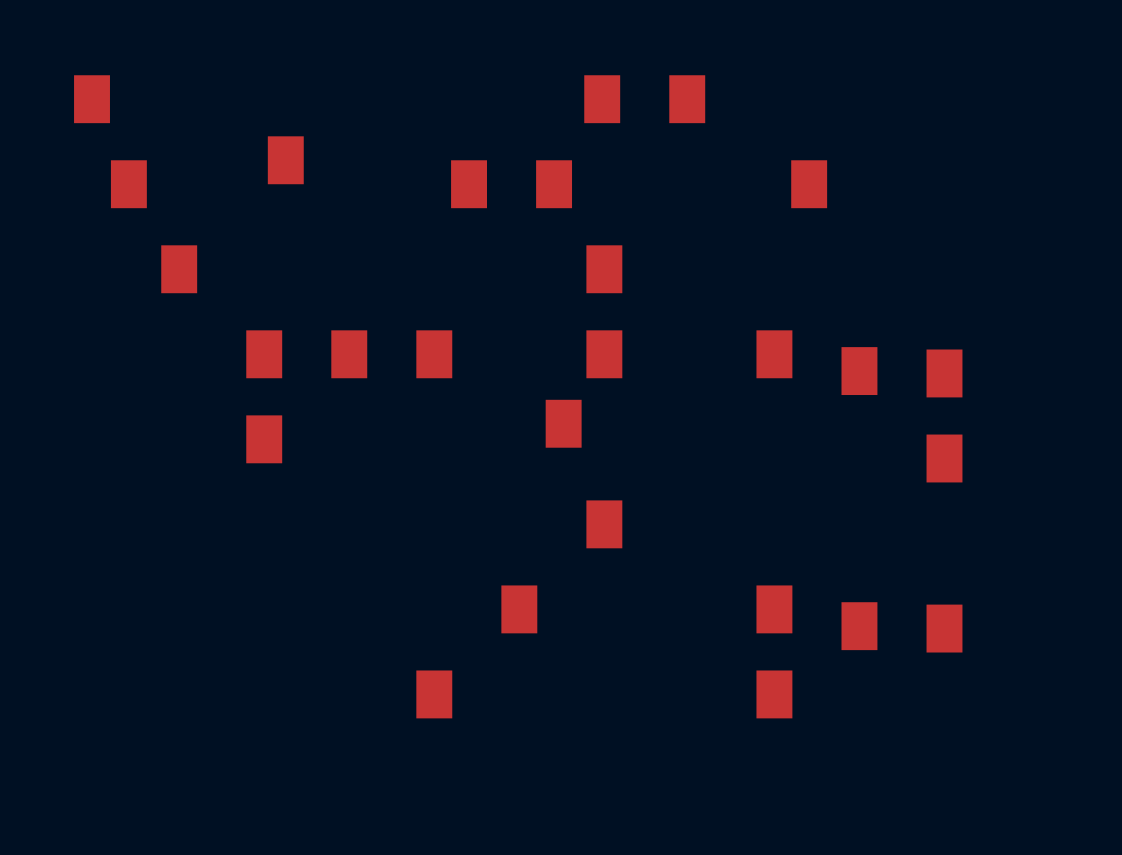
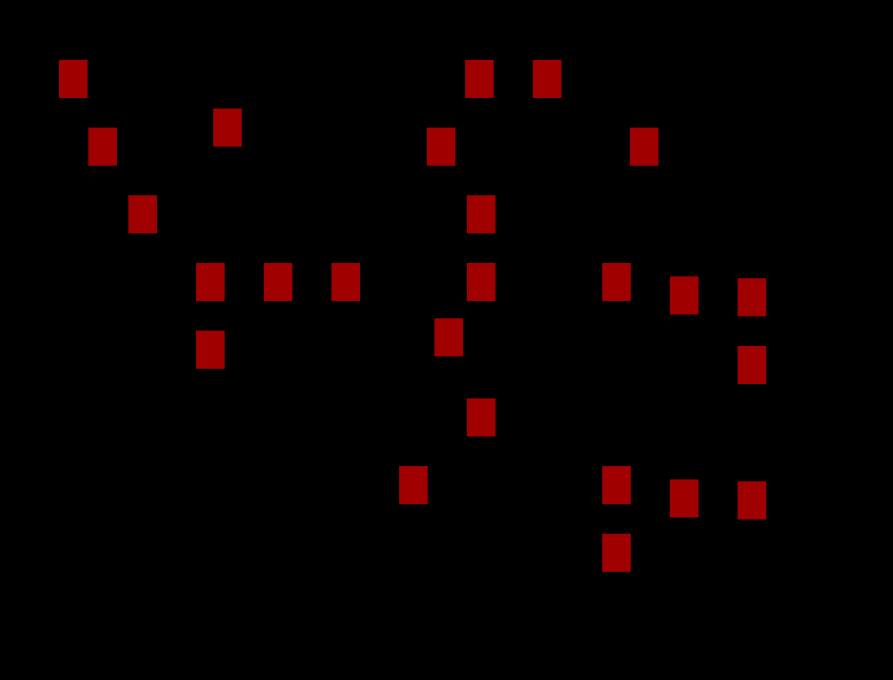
part: (469, 184) -> none
part: (434, 694) -> none

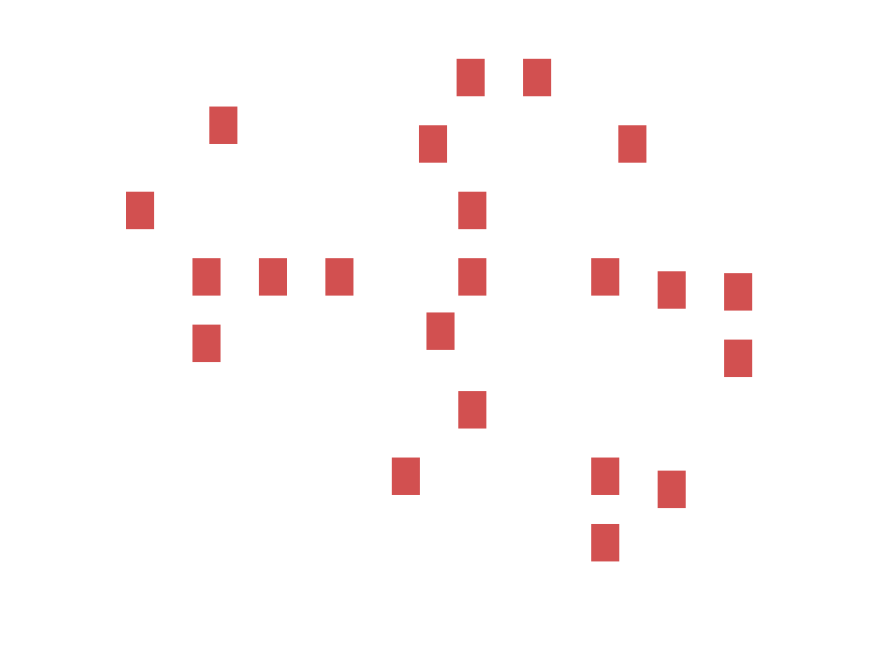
part: (73, 78) -> none
part: (102, 146) -> none
part: (751, 500) -> none

